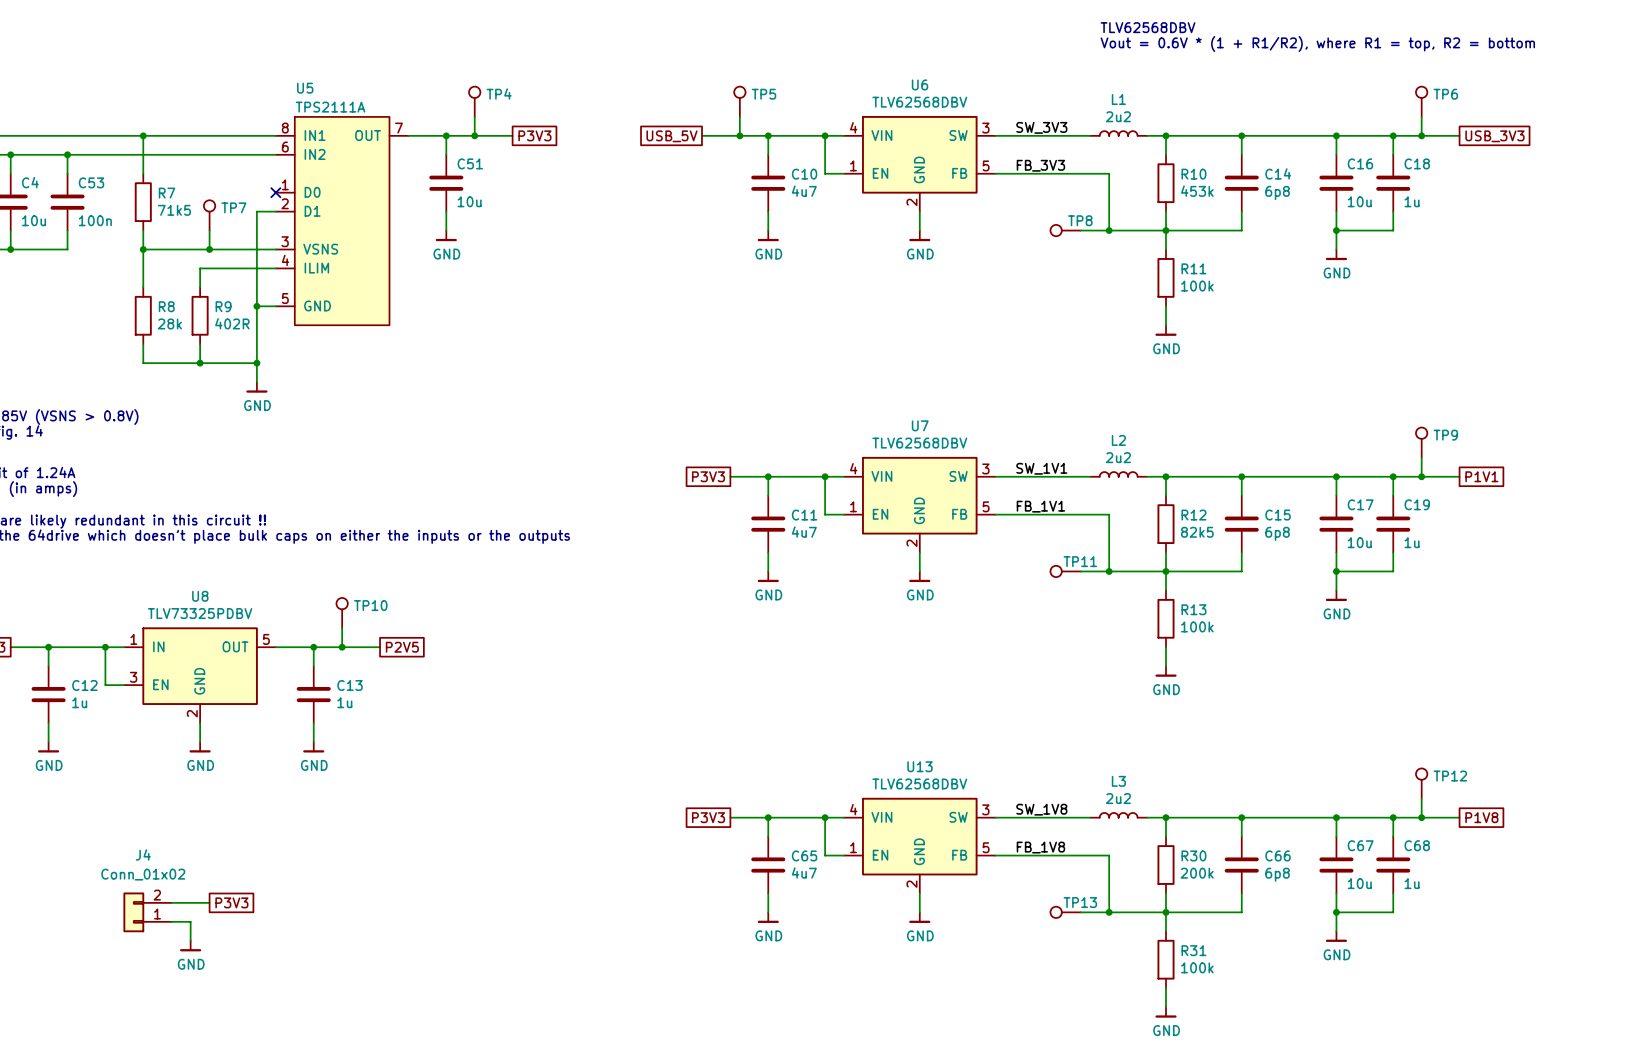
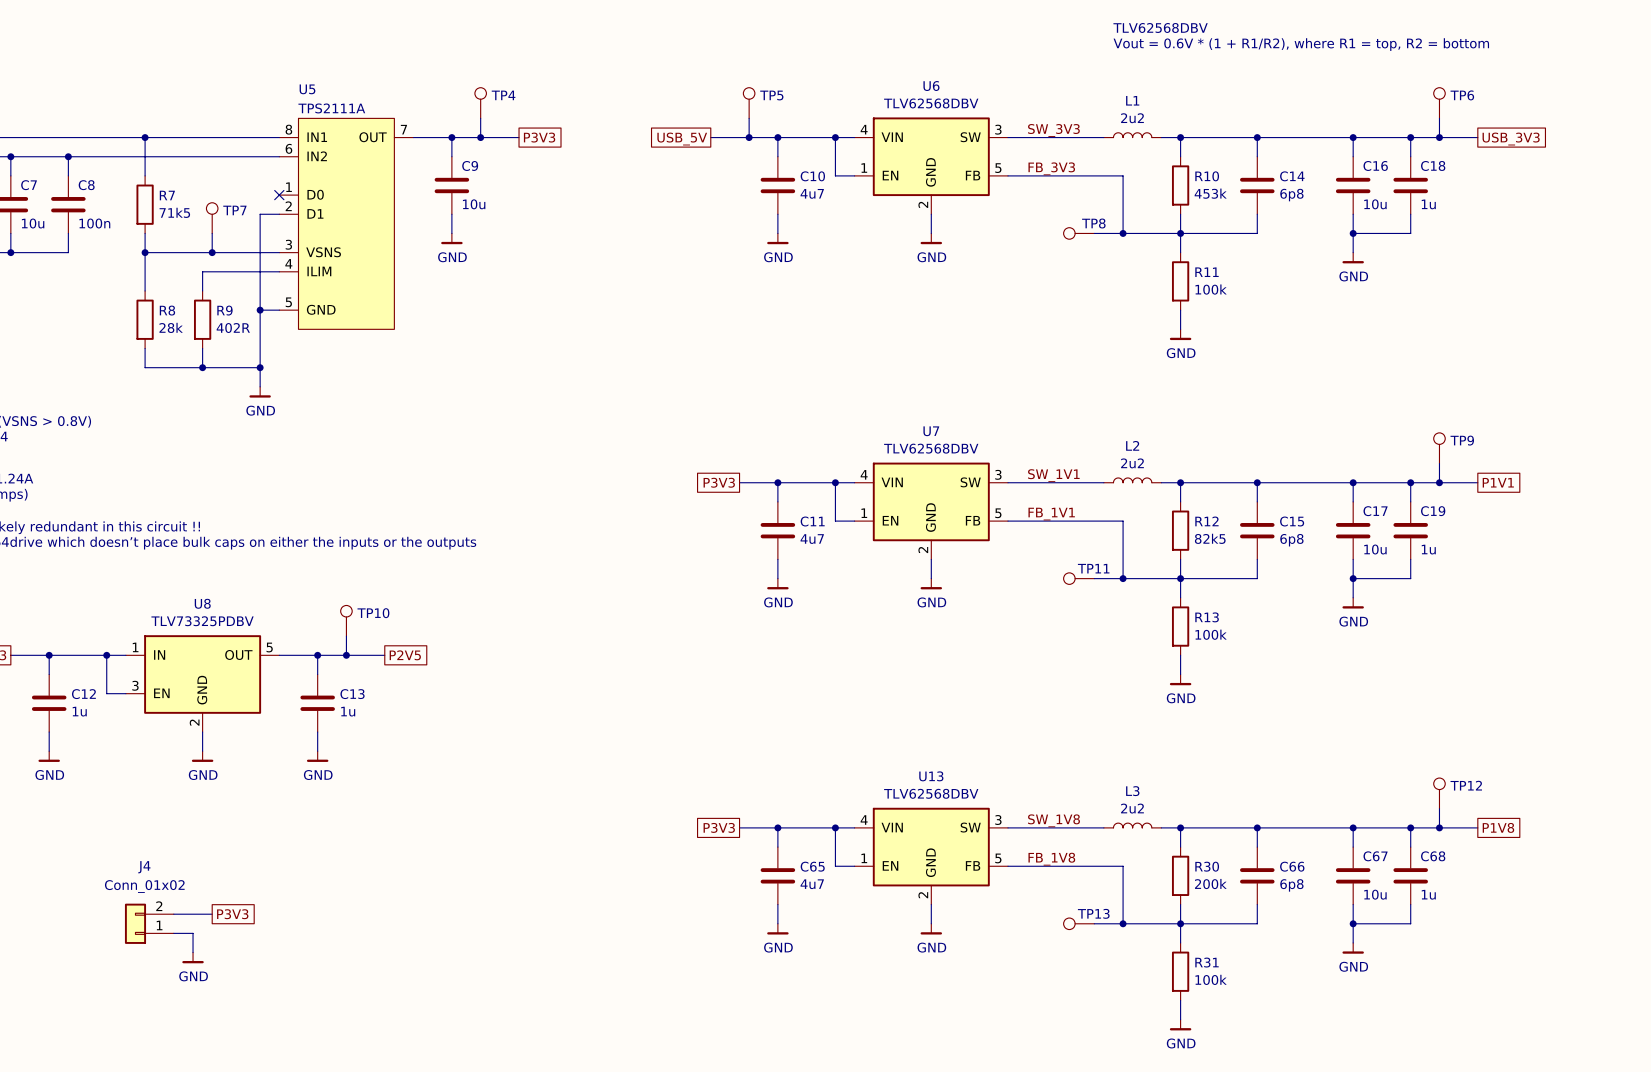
C51 name: C51 (470, 163) -> C9 (470, 165)
C4 name: C4 (30, 182) -> C7 (29, 185)
C53 name: C53 (91, 182) -> C8 (86, 185)

